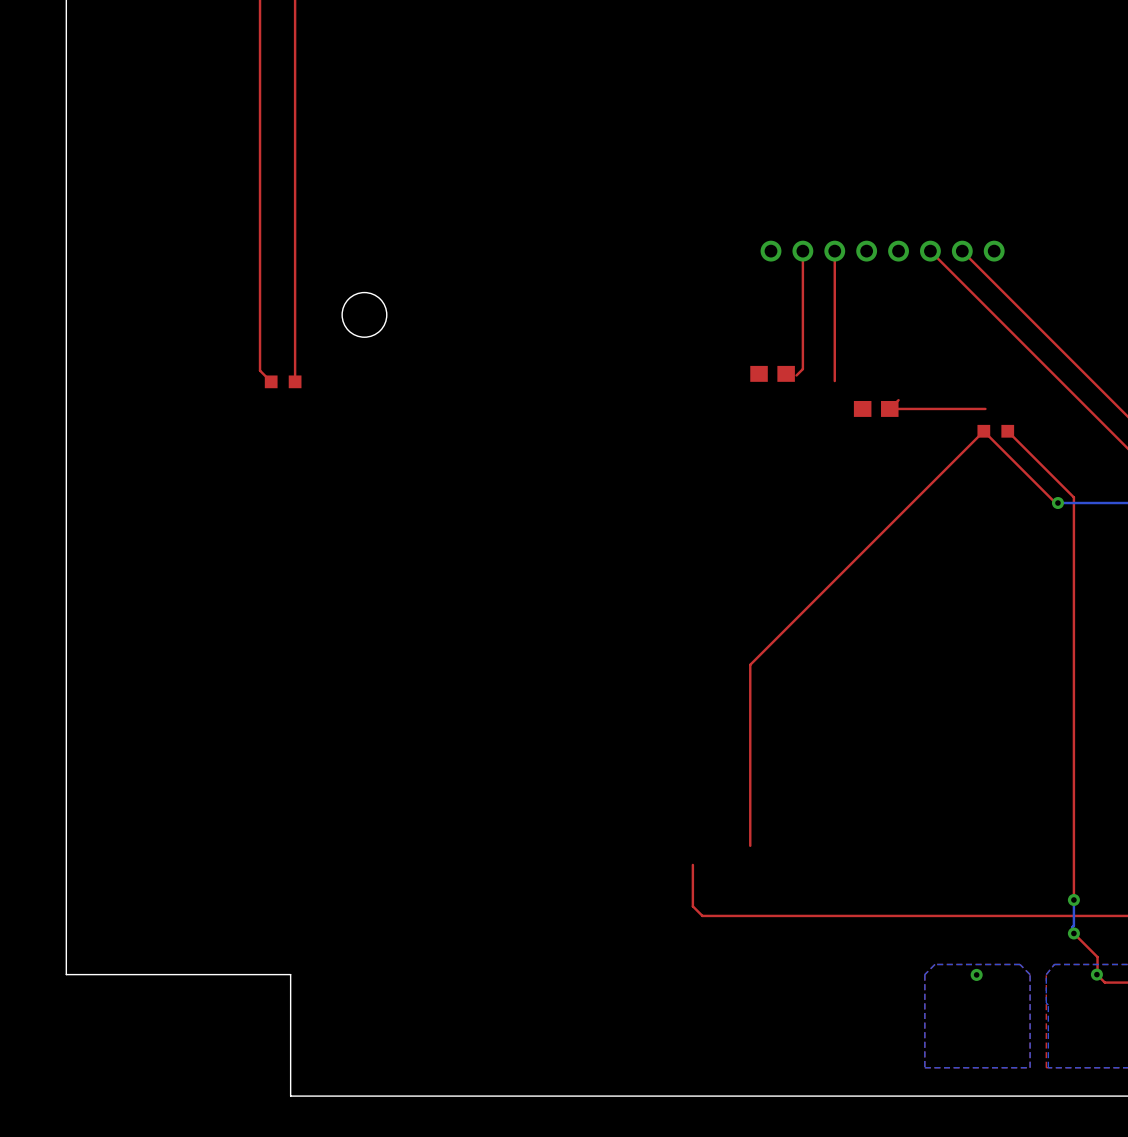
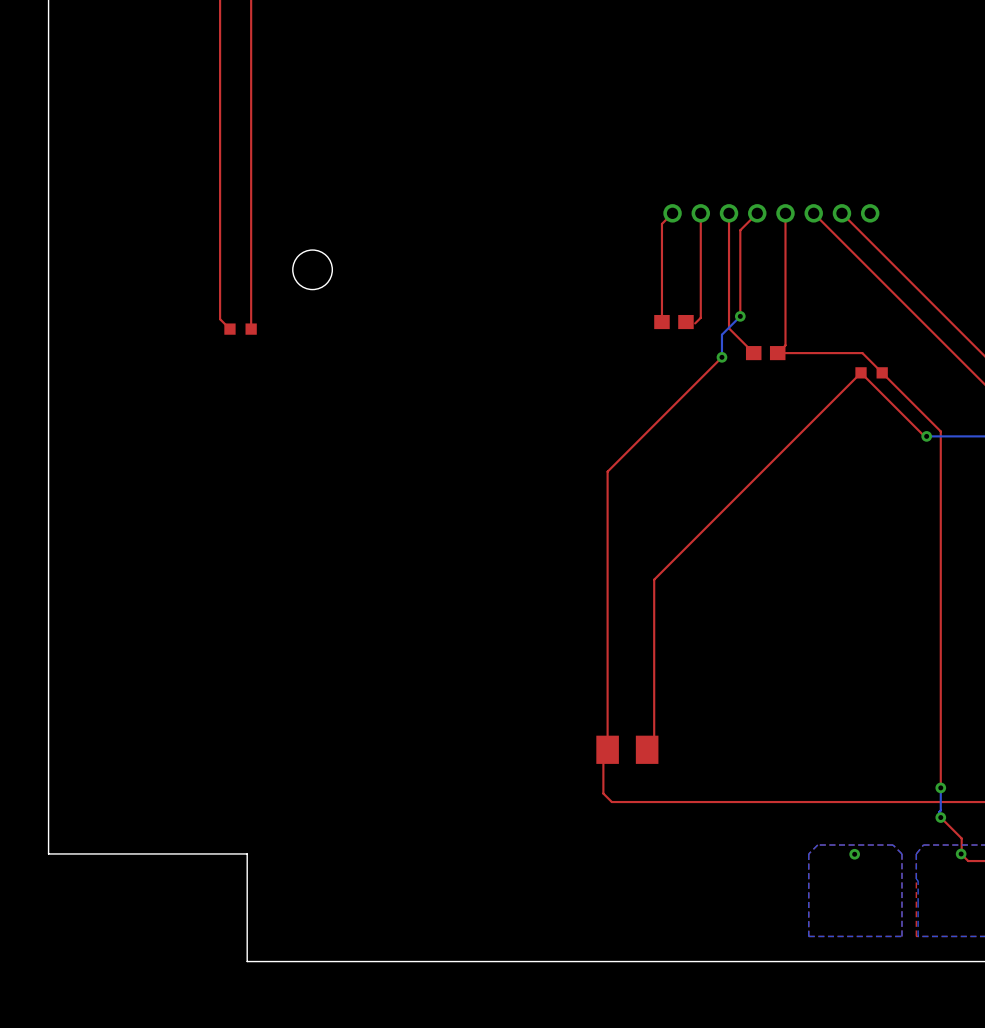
top track: none -> (672, 213) (661, 223) (661, 322)
top track: none -> (757, 213) (740, 230) (740, 316)
top track: none -> (785, 213) (785, 345)
bottom track: none -> (740, 316) (721, 334) (721, 357)
via: none -> (740, 316)
top track: none -> (729, 328) (753, 353)
top track: none -> (862, 353) (882, 372)
top track: none -> (721, 357) (607, 471) (607, 749)
via: none -> (721, 357)
part: none -> (627, 749)

